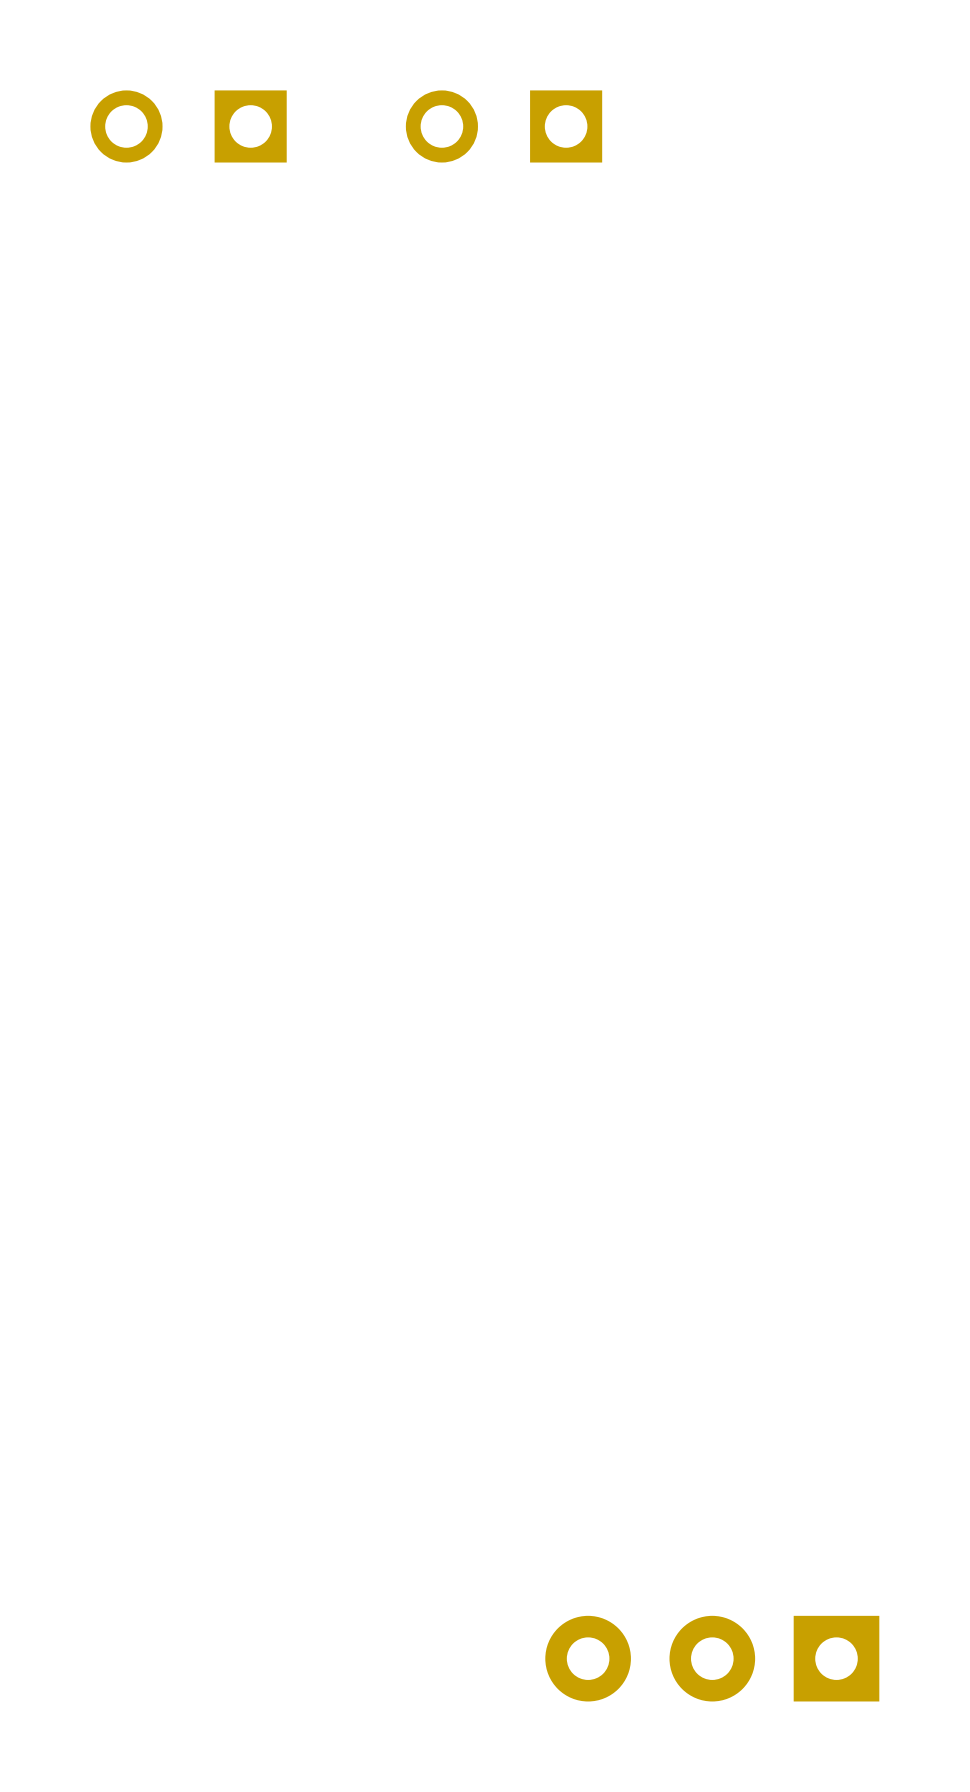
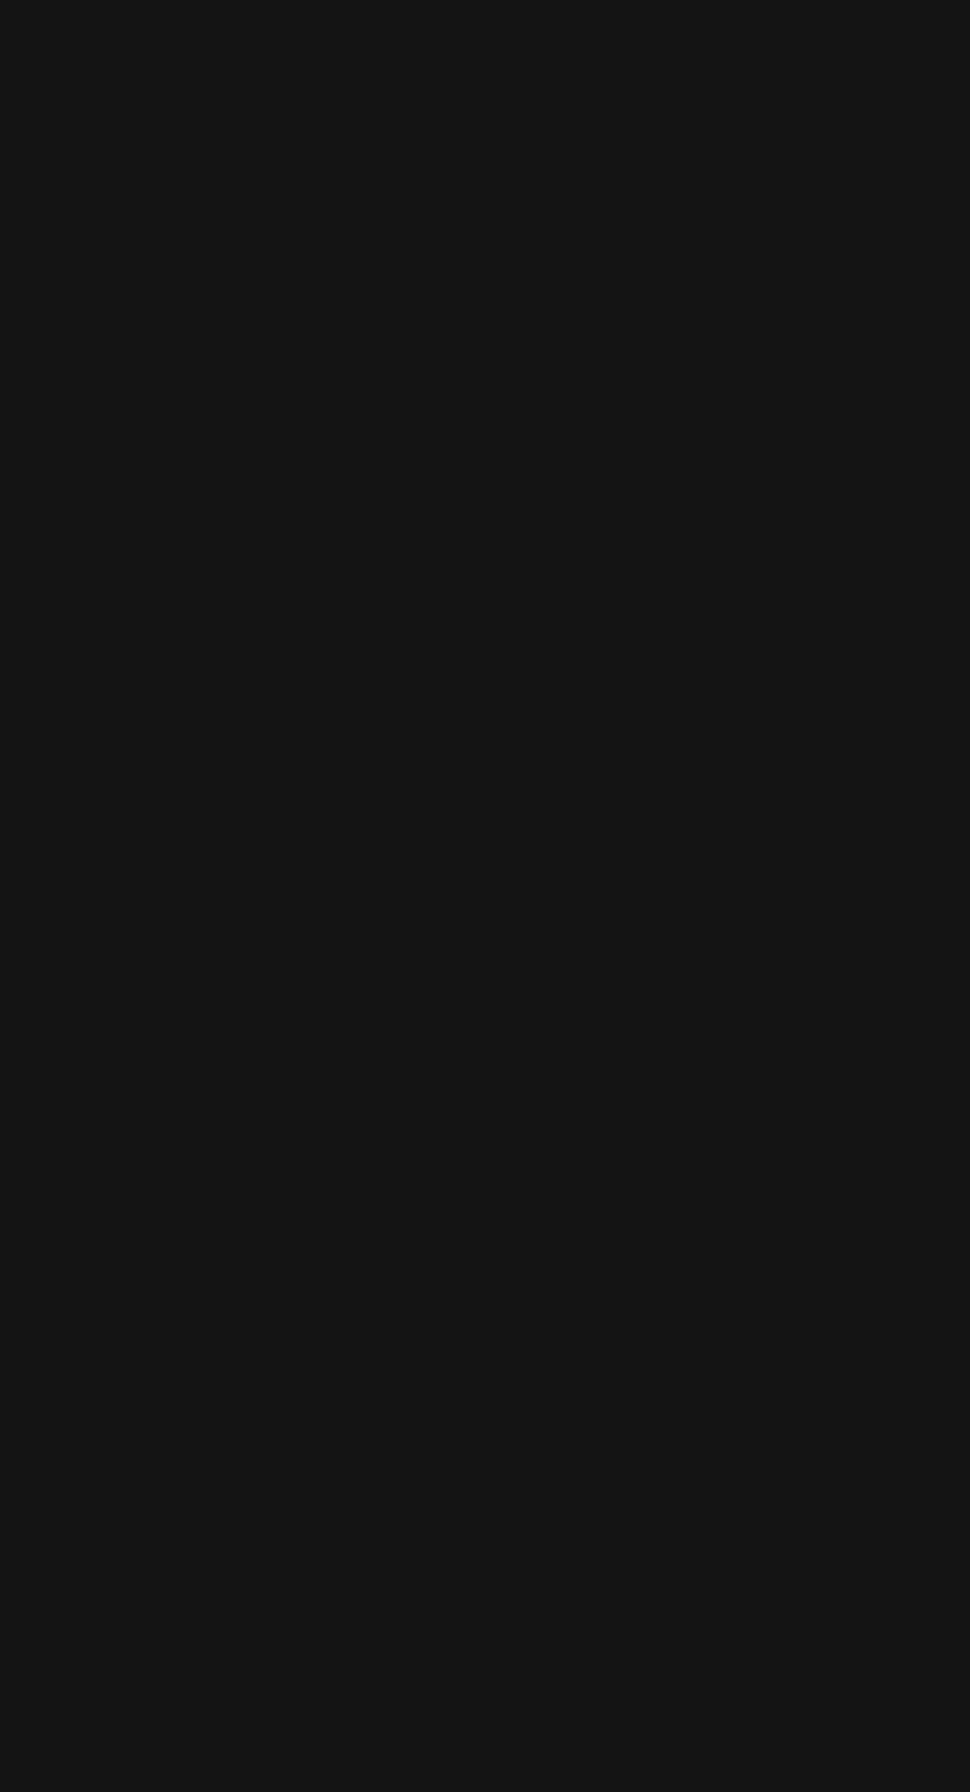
part: (188, 126) -> none
part: (504, 126) -> none
part: (712, 1658) -> none

